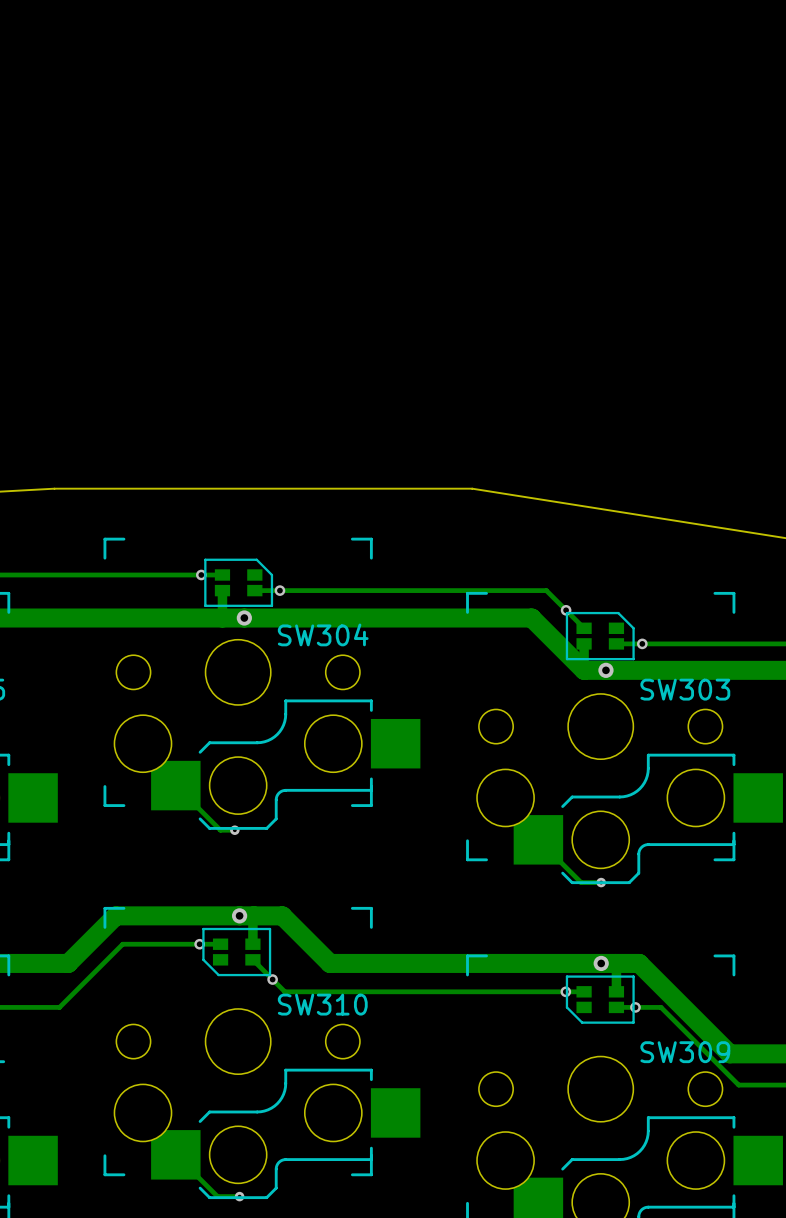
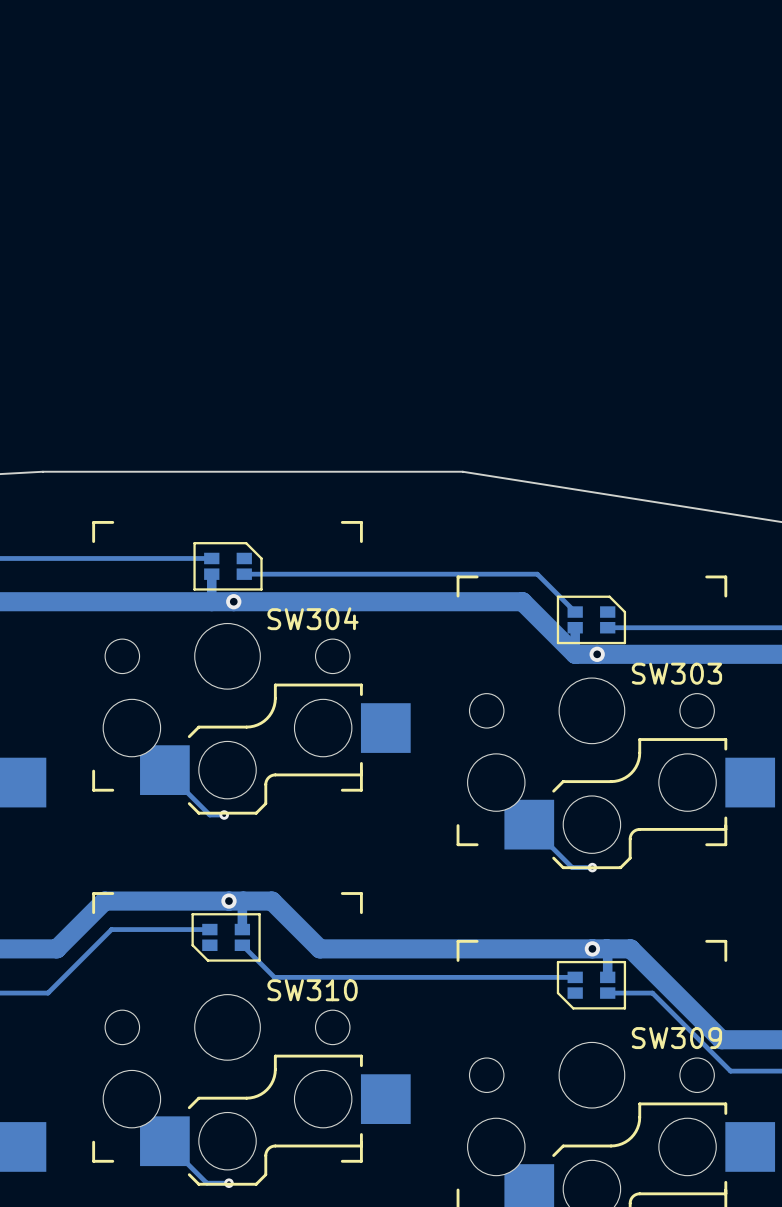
via: (201, 574) -> none
via: (279, 590) -> none
via: (566, 610) -> none
via: (642, 643) -> none
via: (199, 944) -> none
via: (272, 979) -> none
via: (565, 991) -> none
via: (635, 1007) -> none

